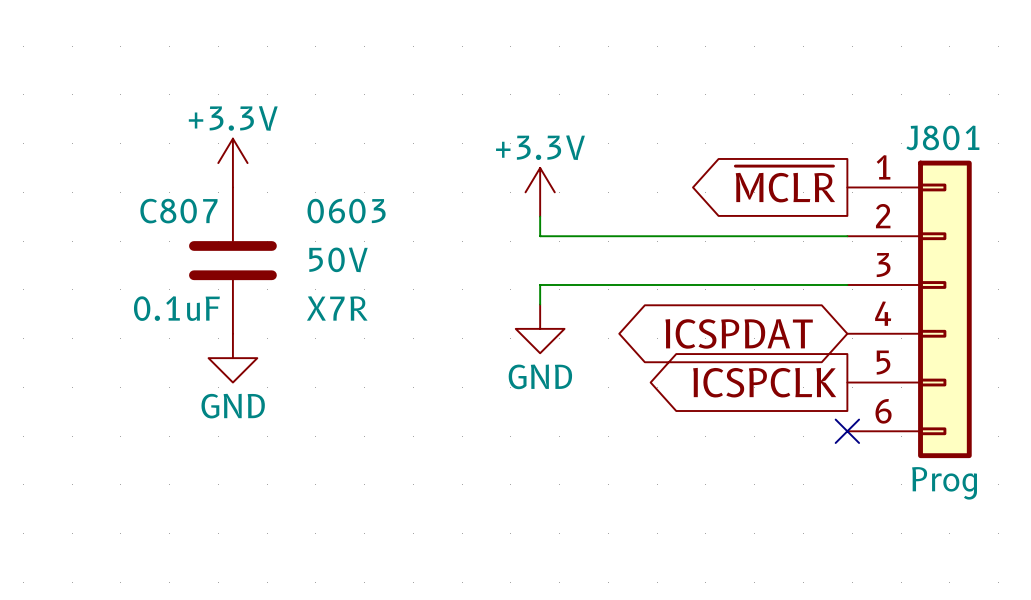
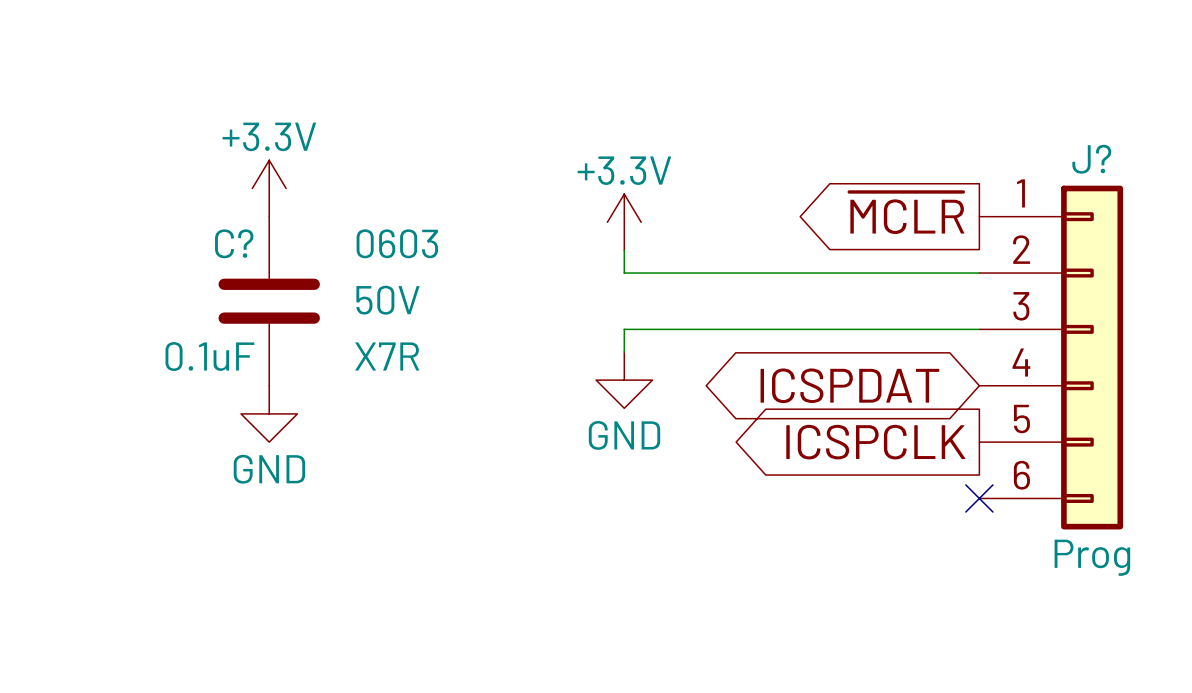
J801 name: J801 (942, 137) -> J? (1091, 159)
C807 name: C807 (178, 211) -> C? (234, 243)

